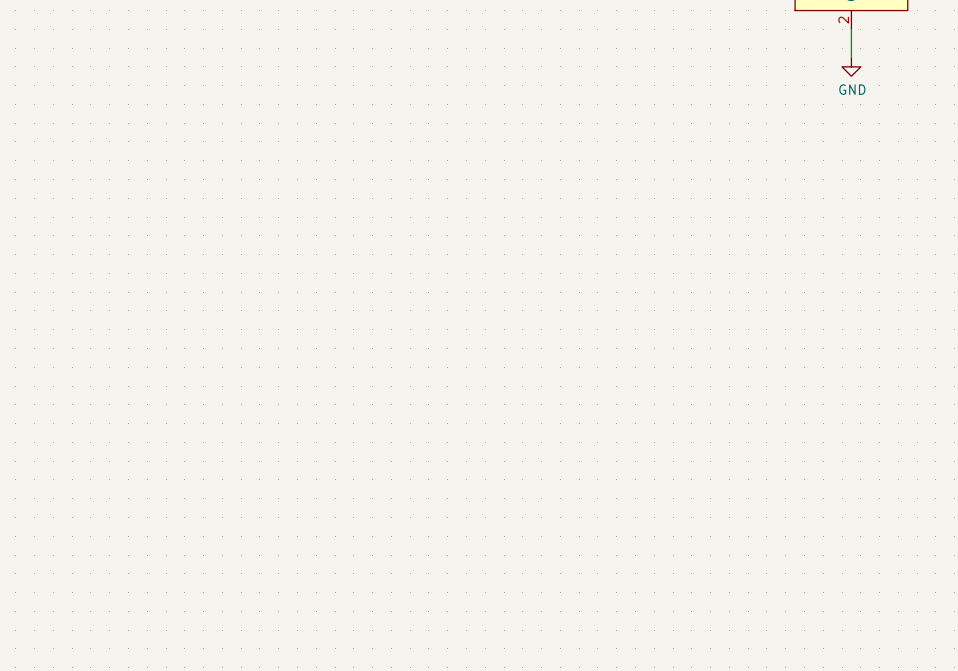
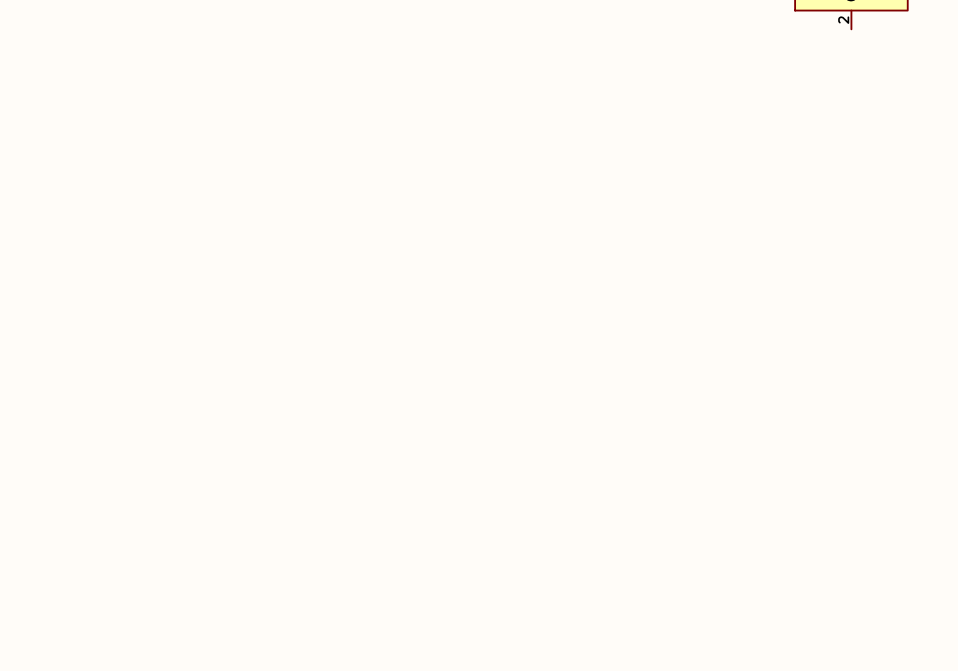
wire: (851, 29) (851, 57) -> none
power symbol: GND (851, 66) -> none

